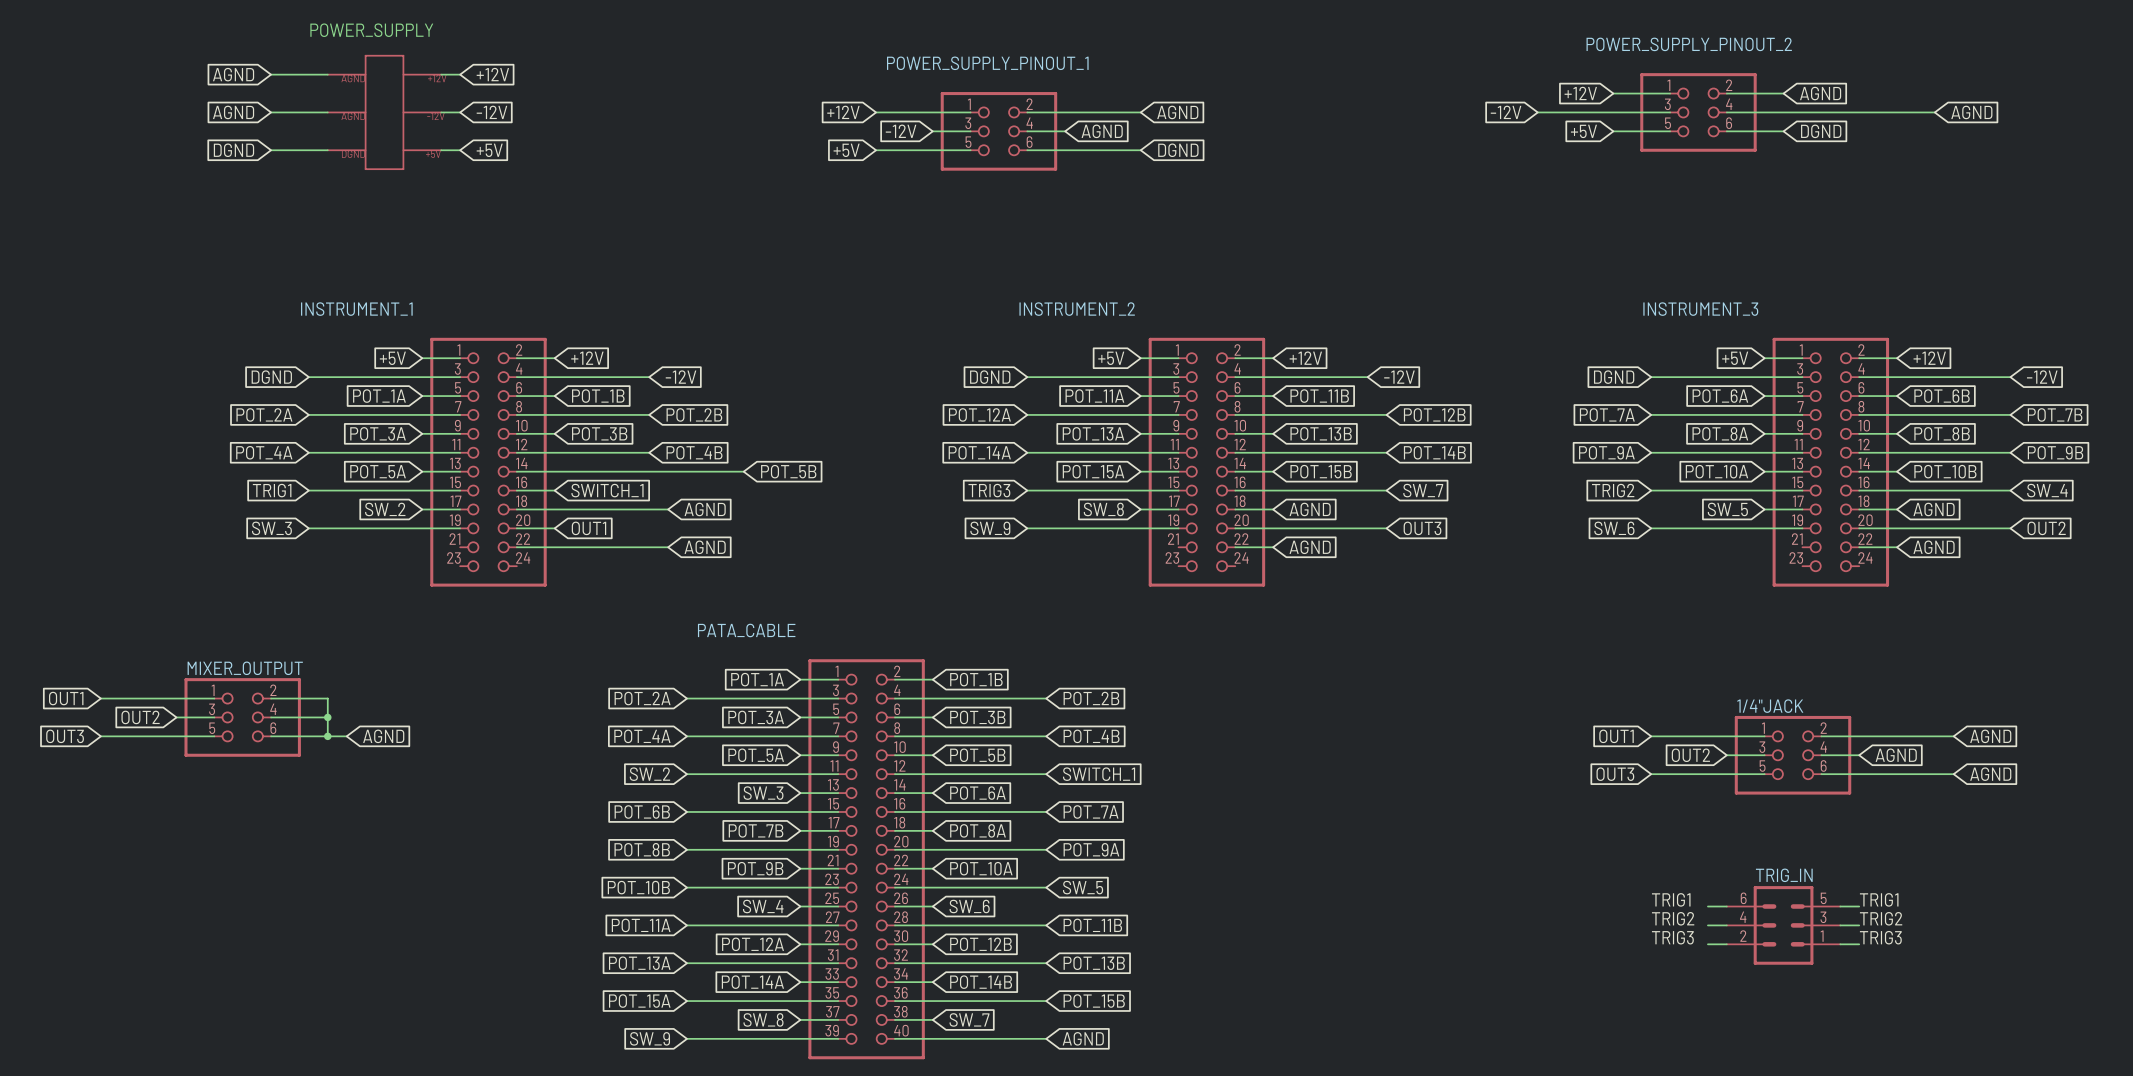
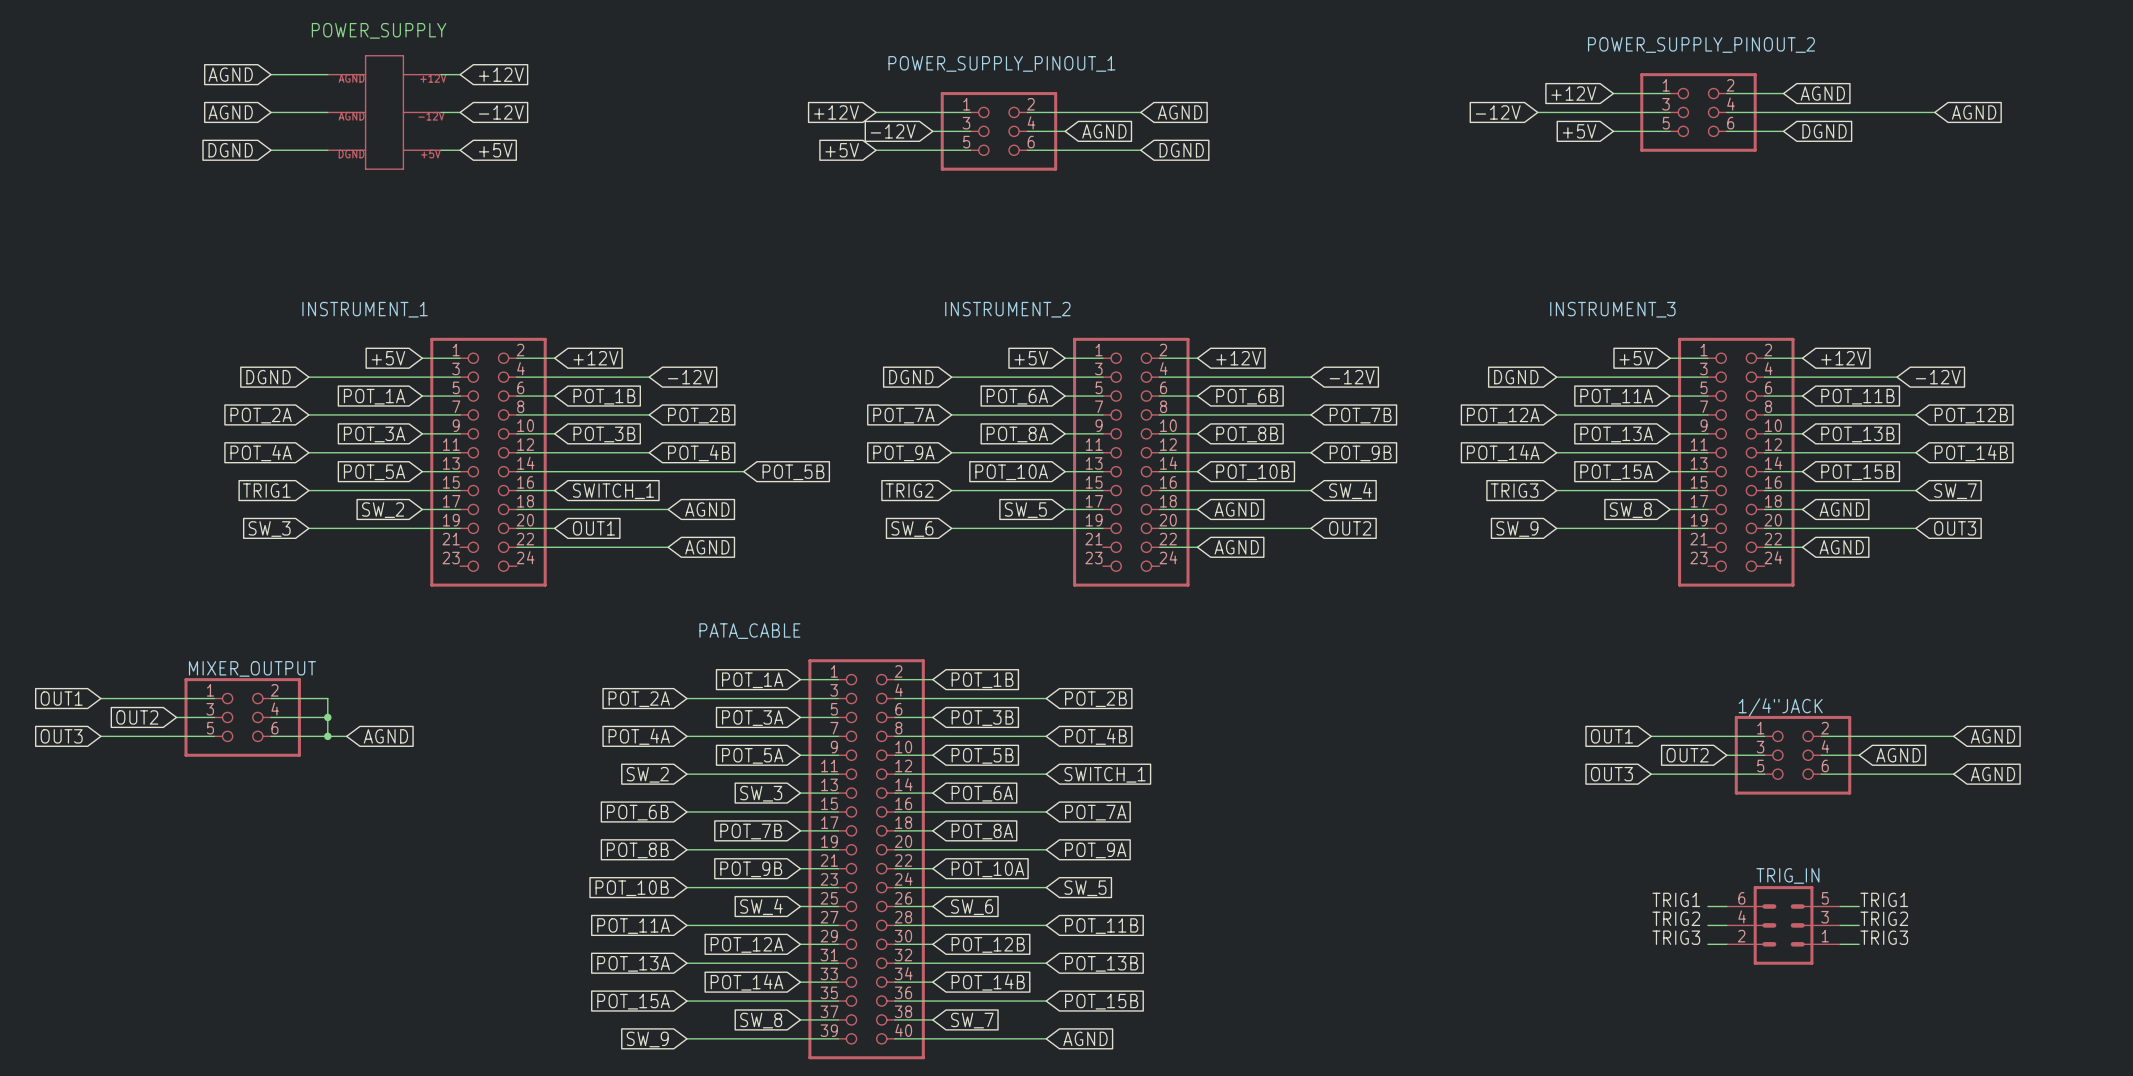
global label position: +5V (1111, 358) -> +5V (1031, 358)
wire: (1235, 358) (1273, 358) -> (1065, 358) (1102, 358)
global label position: +12V (1305, 358) -> +12V (1238, 358)
wire: none -> (1670, 358) (1707, 358)
global label position: +5V (1735, 358) -> +5V (1636, 358)
wire: (1859, 358) (1896, 358) -> none
global label position: +12V (1929, 358) -> +12V (1843, 358)
wire: none -> (951, 377) (1027, 377)
global label position: DGND (990, 377) -> DGND (911, 377)
wire: (1102, 377) (1159, 377) -> (1178, 377) (1235, 377)
wire: (1310, 377) (1367, 377) -> none
global label position: -12V (1399, 377) -> -12V (1352, 377)
wire: none -> (1556, 377) (1651, 377)
global label position: DGND (1614, 377) -> DGND (1516, 377)
wire: (1707, 377) (1764, 377) -> (1802, 377) (1859, 377)
wire: (1896, 377) (2010, 377) -> none
global label position: -12V (2042, 377) -> -12V (1938, 377)
global label: none -> POT_6A (1017, 396)
global label: POT_11A (1094, 396) -> none
wire: (1235, 396) (1273, 396) -> (1065, 396) (1102, 396)
global label: none -> POT_6B (1247, 396)
global label: POT_11B (1319, 396) -> none
global label: none -> POT_11A (1616, 396)
wire: none -> (1670, 396) (1707, 396)
global label: POT_6A (1720, 396) -> none
global label: none -> POT_11B (1857, 396)
wire: (1859, 396) (1896, 396) -> none
global label: POT_6B (1942, 396) -> none
global label: none -> POT_7A (903, 415)
wire: none -> (951, 414) (1027, 414)
global label: POT_12A (979, 414) -> none
wire: (1102, 414) (1159, 414) -> (1178, 414) (1235, 414)
wire: (1310, 414) (1386, 414) -> none
global label: none -> POT_7B (1360, 415)
global label: POT_12B (1434, 414) -> none
global label: none -> POT_12A (1503, 415)
wire: none -> (1556, 414) (1651, 414)
global label: POT_7A (1607, 414) -> none
wire: (1707, 414) (1764, 414) -> (1802, 414) (1859, 414)
wire: (1915, 414) (2010, 414) -> none
global label: none -> POT_12B (1971, 415)
global label: POT_7B (2055, 414) -> none
global label: none -> POT_8A (1017, 434)
global label: POT_13A (1093, 433) -> none
wire: (1235, 433) (1273, 433) -> (1065, 433) (1102, 433)
global label: none -> POT_8B (1247, 434)
global label: POT_13B (1321, 433) -> none
global label: none -> POT_13A (1616, 434)
wire: none -> (1670, 433) (1707, 433)
global label: POT_8A (1720, 433) -> none
global label: none -> POT_13B (1857, 434)
wire: (1859, 433) (1896, 433) -> none
global label: POT_8B (1942, 433) -> none
global label: none -> POT_9A (903, 453)
wire: none -> (951, 452) (1027, 452)
global label: POT_14A (979, 452) -> none
wire: (1102, 452) (1159, 452) -> (1178, 452) (1235, 452)
wire: (1310, 452) (1386, 452) -> none
global label: none -> POT_9B (1360, 453)
global label: POT_14B (1434, 452) -> none
global label: none -> POT_14A (1503, 453)
wire: none -> (1556, 452) (1651, 452)
global label: POT_9A (1606, 452) -> none
wire: (1707, 452) (1764, 452) -> (1802, 452) (1859, 452)
wire: (1915, 452) (2010, 452) -> none
global label: none -> POT_14B (1971, 453)
global label: POT_9B (2055, 452) -> none
INSTRUMENT_2 position: (1206, 462) -> (1131, 462)
INSTRUMENT_3 position: (1830, 462) -> (1736, 462)
global label: none -> POT_10A (1011, 472)
global label: POT_15A (1093, 471) -> none
wire: (1235, 471) (1273, 471) -> (1065, 471) (1102, 471)
global label: none -> POT_10B (1252, 472)
global label: POT_15B (1321, 471) -> none
global label: none -> POT_15A (1616, 472)
wire: none -> (1670, 471) (1707, 471)
global label: POT_10A (1716, 471) -> none
global label: none -> POT_15B (1857, 472)
wire: (1859, 471) (1896, 471) -> none
global label: POT_10B (1945, 471) -> none
wire: none -> (951, 490) (1027, 490)
global label: TRIG3 (989, 490) -> TRIG2 (909, 490)
wire: (1102, 490) (1159, 490) -> (1178, 490) (1235, 490)
wire: (1310, 490) (1386, 490) -> none
global label: SW_7 (1423, 490) -> SW_4 (1350, 490)
wire: none -> (1556, 490) (1651, 490)
global label: TRIG2 (1613, 490) -> TRIG3 (1514, 490)
wire: (1707, 490) (1764, 490) -> (1802, 490) (1859, 490)
wire: (1915, 490) (2010, 490) -> none
global label: none -> SW_7 (1955, 491)
global label: SW_4 (2047, 490) -> none
global label: none -> SW_5 (1025, 510)
global label: SW_8 (1103, 509) -> none
wire: (1235, 509) (1273, 509) -> (1065, 509) (1102, 509)
global label position: AGND (1310, 509) -> AGND (1236, 509)
wire: none -> (1670, 509) (1707, 509)
global label: SW_5 (1727, 509) -> none
global label: none -> AGND (1841, 509)
wire: (1859, 509) (1896, 509) -> none
global label: AGND (1934, 509) -> none
global label: none -> SW_6 (912, 529)
wire: none -> (951, 528) (1027, 528)
global label: SW_9 (990, 528) -> none
wire: (1102, 528) (1159, 528) -> (1178, 528) (1235, 528)
wire: (1310, 528) (1386, 528) -> none
global label: OUT3 (1422, 528) -> OUT2 (1350, 528)
global label: none -> SW_9 (1517, 529)
wire: none -> (1556, 528) (1651, 528)
global label: SW_6 (1614, 528) -> SW_8 (1630, 510)
wire: (1707, 528) (1764, 528) -> (1802, 528) (1859, 528)
wire: (1915, 528) (2010, 528) -> none
global label: none -> OUT3 (1955, 528)
global label: OUT2 (2046, 528) -> none
wire: (1235, 547) (1273, 547) -> (1159, 547) (1197, 547)
global label position: AGND (1310, 547) -> AGND (1236, 547)
global label: none -> AGND (1841, 547)
wire: (1859, 547) (1896, 547) -> (1764, 547) (1802, 547)
global label: AGND (1934, 547) -> none

